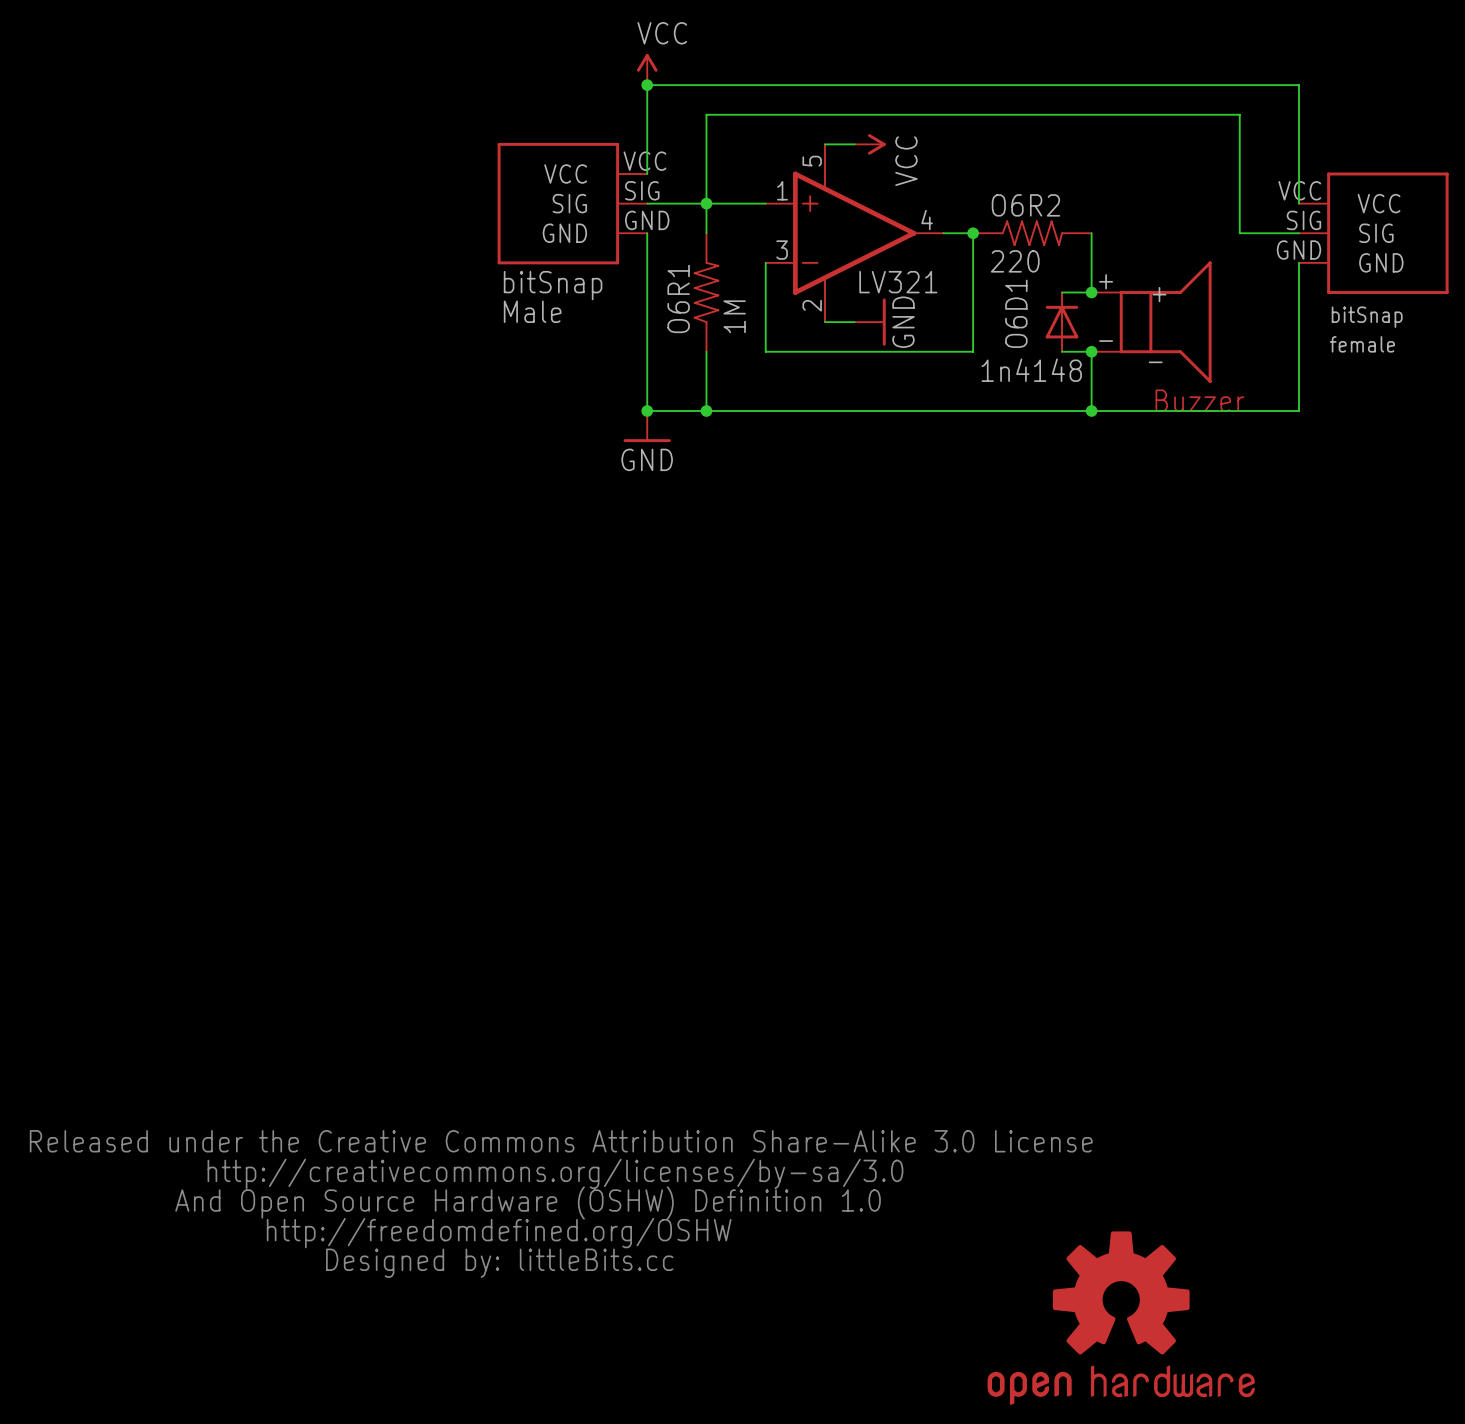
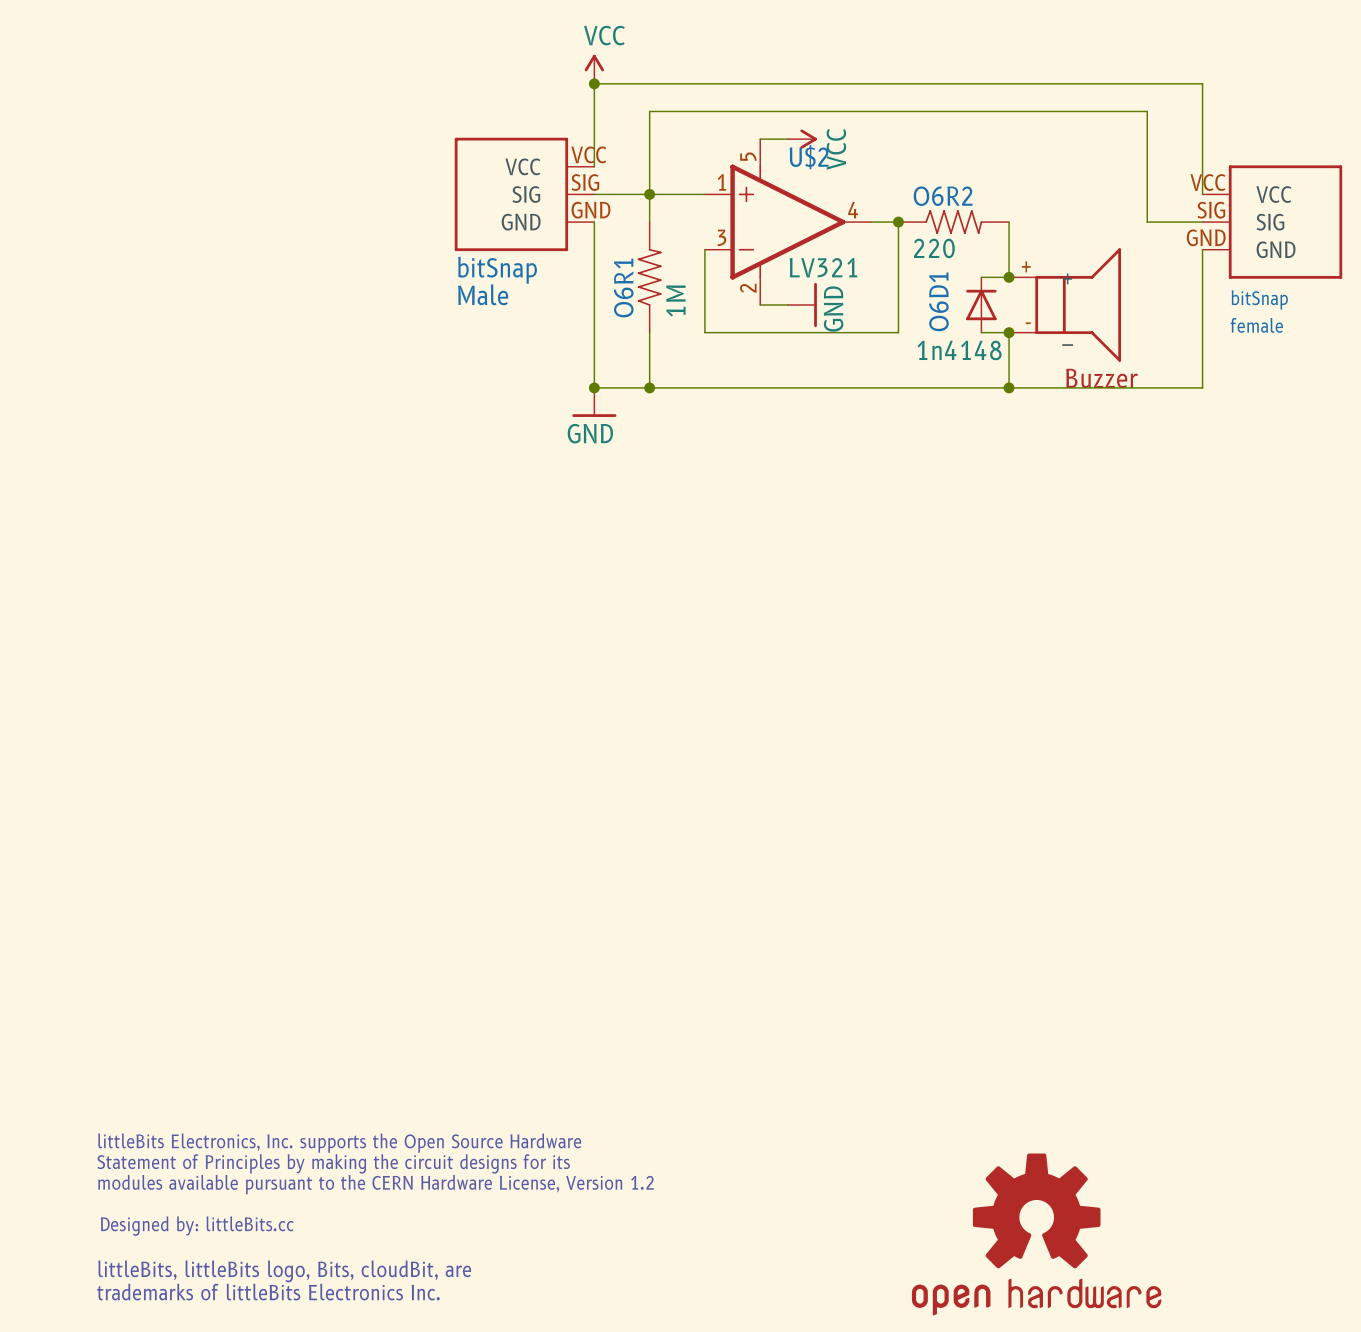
U$2 name: none -> U$2 (809, 157)
part: (561, 1203) -> none
part: none -> (375, 1216)

